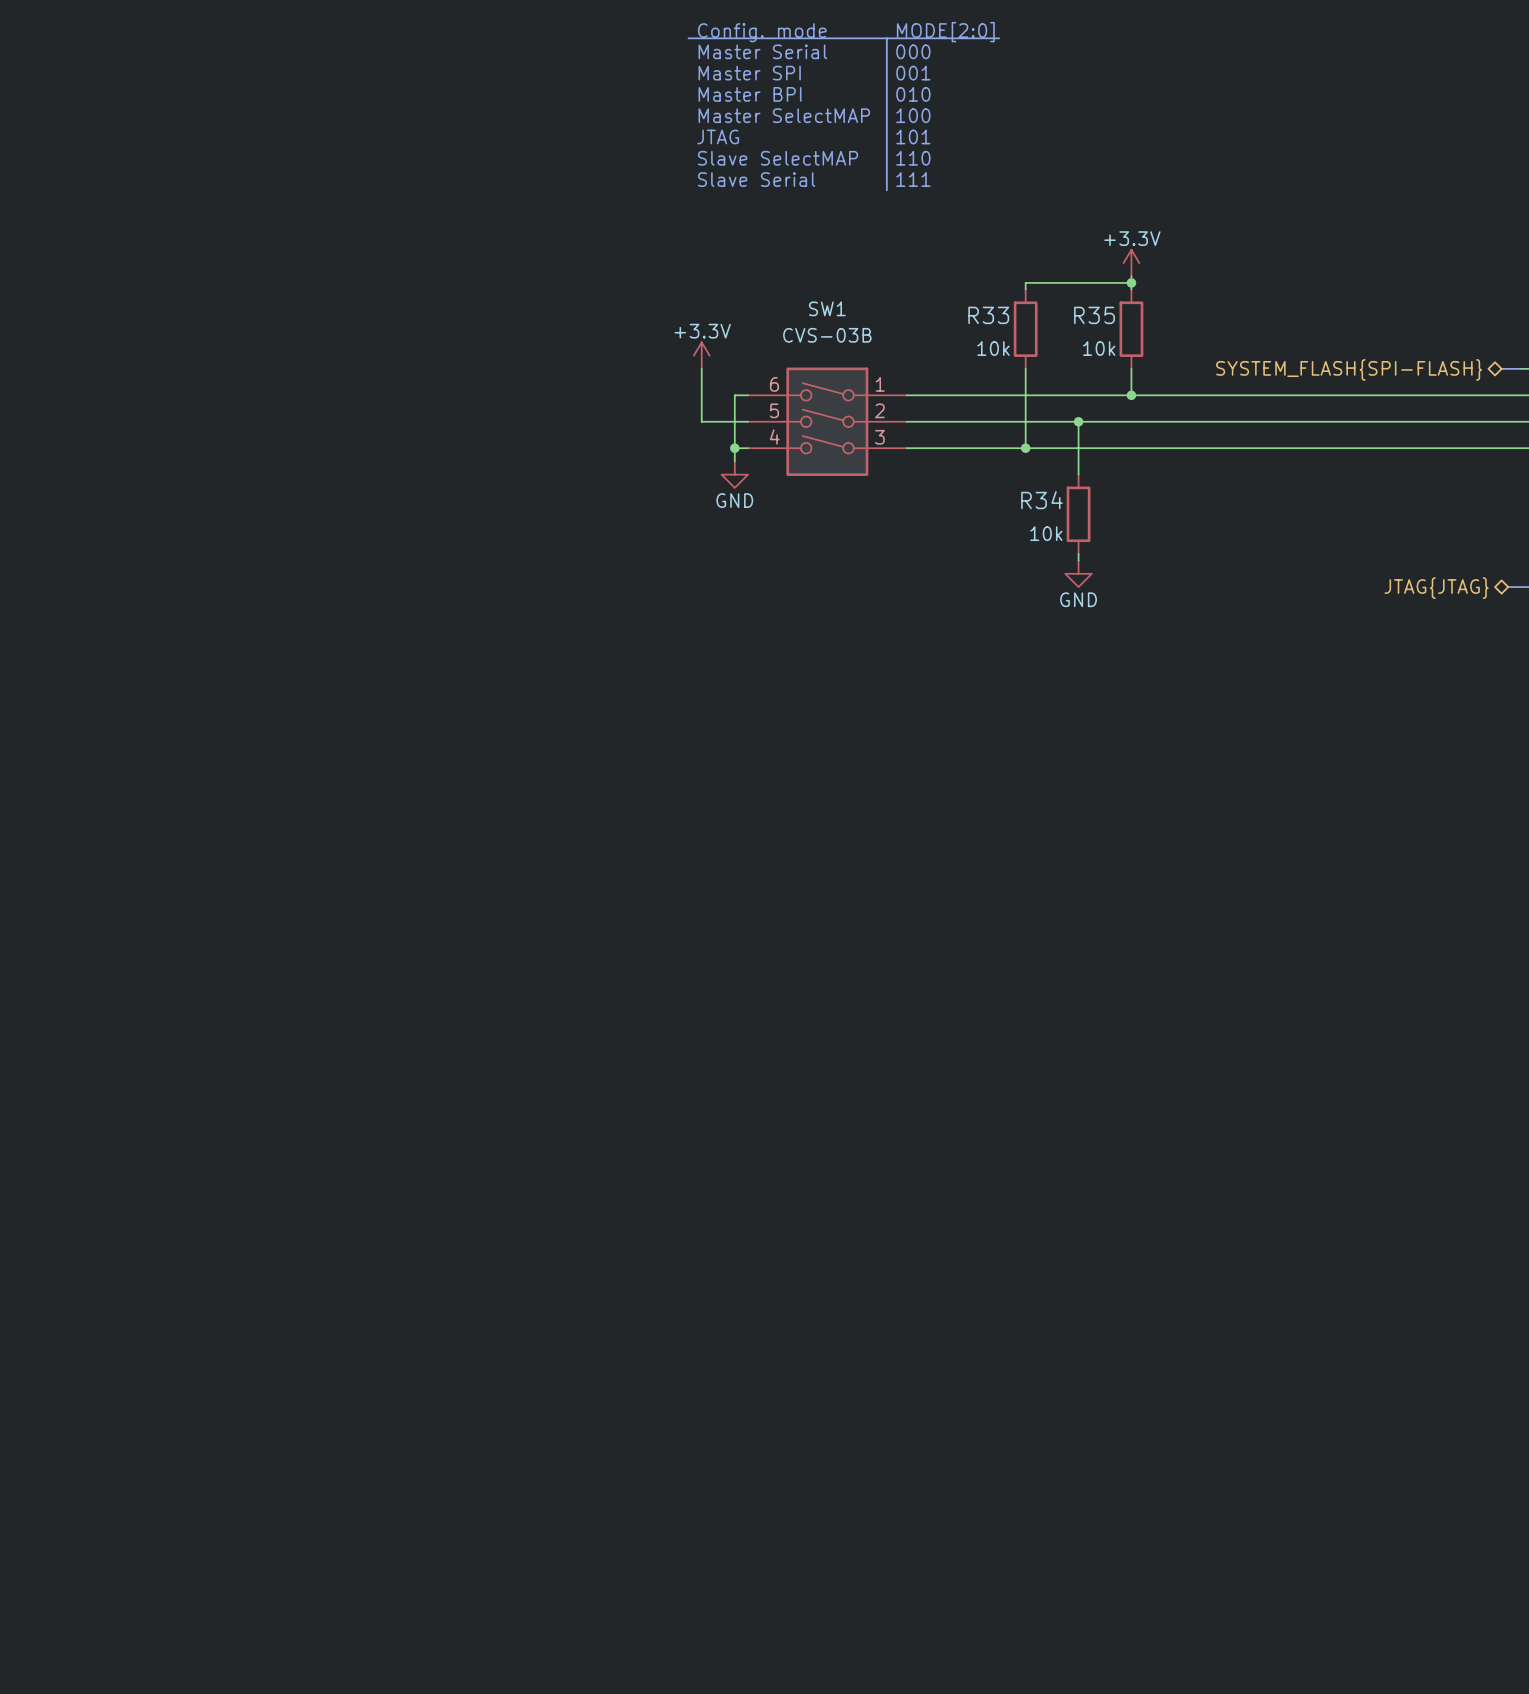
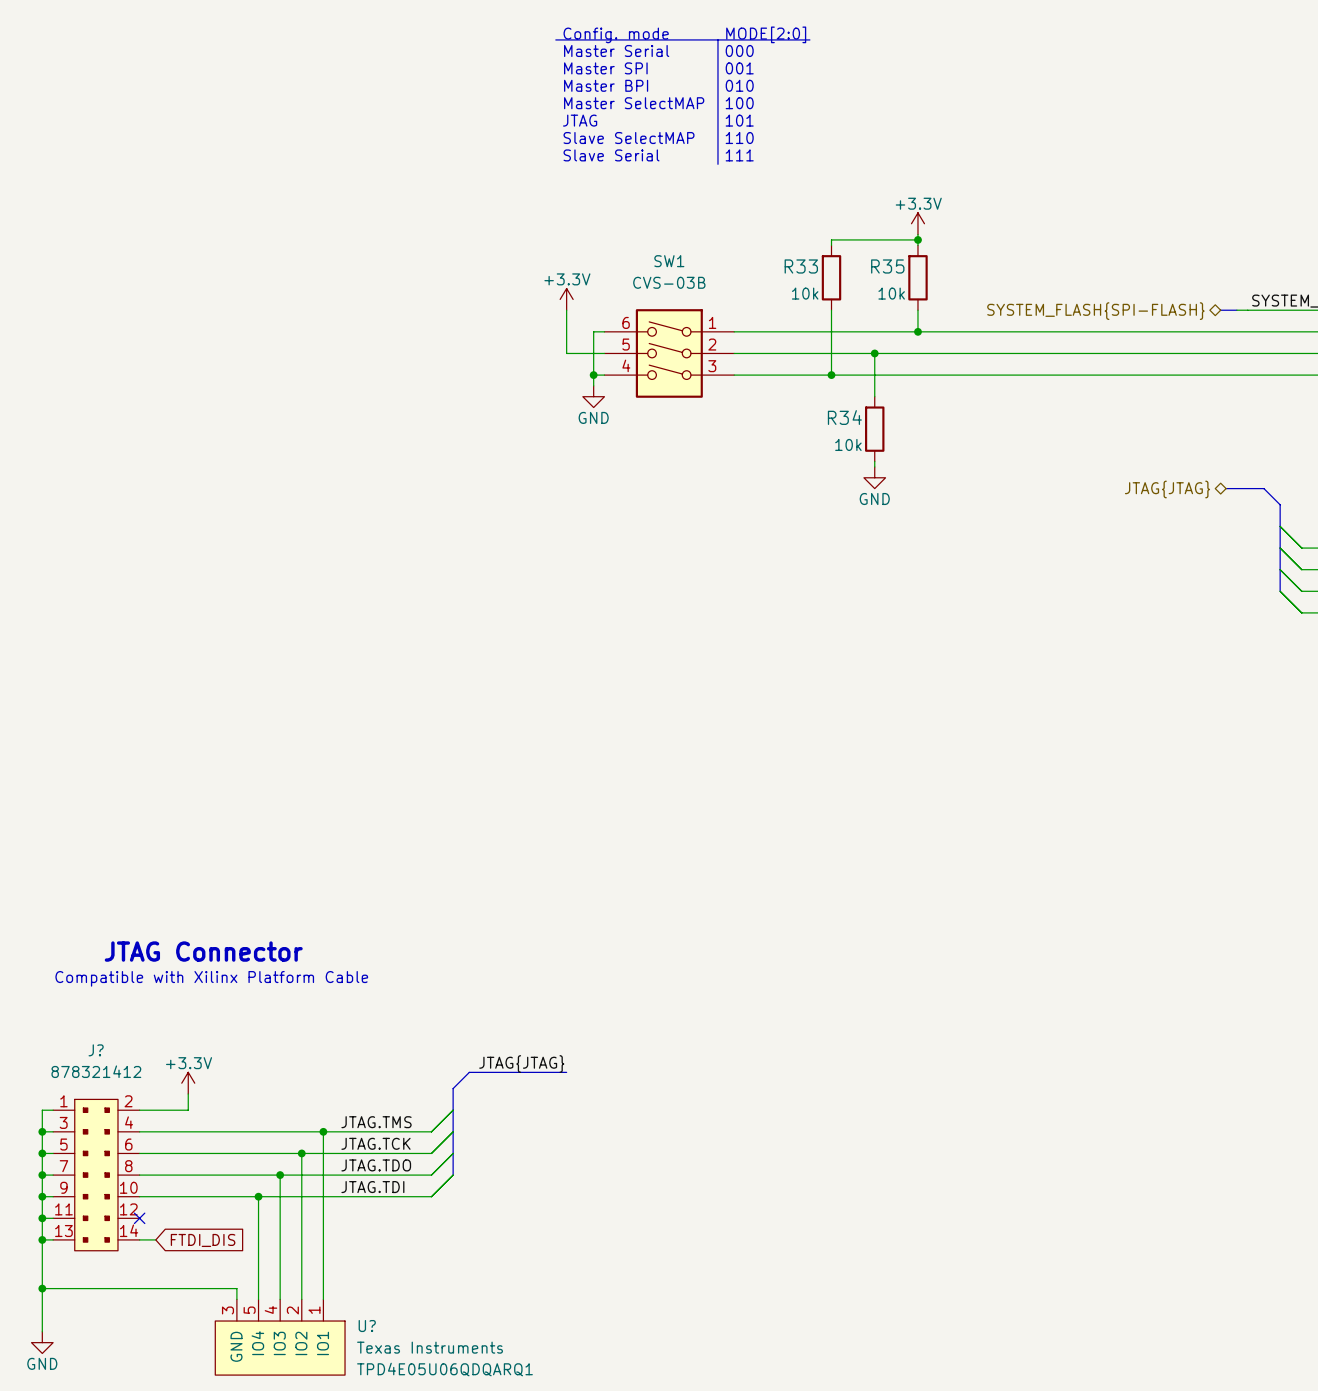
text: none -> JTAG Connector (203, 951)
text: none -> Compatible with Xilinx Platform Cable (211, 978)
label: none -> JTAG{JTAG} (521, 1064)
bus: none -> (566, 1072) (469, 1072) (453, 1088) (453, 1175)
power symbol: none -> +3.3V (188, 1083)
wire: none -> (188, 1094) (188, 1110) (139, 1110)
wire: none -> (53, 1110) (42, 1110) (42, 1331)
wire: none -> (453, 1110) (431, 1131) (139, 1131)
label: none -> JTAG.TMS (376, 1122)
wire: none -> (42, 1131) (53, 1131)
junction: none -> (42, 1131)
wire: none -> (323, 1131) (323, 1299)
junction: none -> (323, 1131)
wire: none -> (453, 1131) (431, 1153) (139, 1153)
label: none -> JTAG.TCK (375, 1143)
wire: none -> (42, 1153) (53, 1153)
junction: none -> (42, 1153)
wire: none -> (301, 1153) (301, 1299)
junction: none -> (301, 1153)
wire: none -> (453, 1153) (431, 1175) (139, 1175)
label: none -> JTAG.TDO (376, 1165)
wire: none -> (42, 1175) (53, 1175)
junction: none -> (42, 1175)
J?: none -> 878321412 (96, 1175)
wire: none -> (280, 1175) (280, 1299)
junction: none -> (280, 1175)
wire: none -> (453, 1175) (431, 1196) (139, 1196)
label: none -> JTAG.TDI (372, 1187)
wire: none -> (42, 1196) (53, 1196)
junction: none -> (42, 1196)
wire: none -> (258, 1196) (258, 1299)
junction: none -> (258, 1196)
wire: none -> (42, 1218) (53, 1218)
junction: none -> (42, 1218)
no-connect mark: none -> (139, 1218)
wire: none -> (42, 1239) (53, 1239)
junction: none -> (42, 1239)
wire: none -> (139, 1239) (155, 1239)
global label: none -> FTDI_DIS (203, 1240)
wire: none -> (42, 1288) (236, 1288) (236, 1299)
junction: none -> (42, 1288)
U?: none -> (280, 1337)
power symbol: none -> GND (42, 1342)

